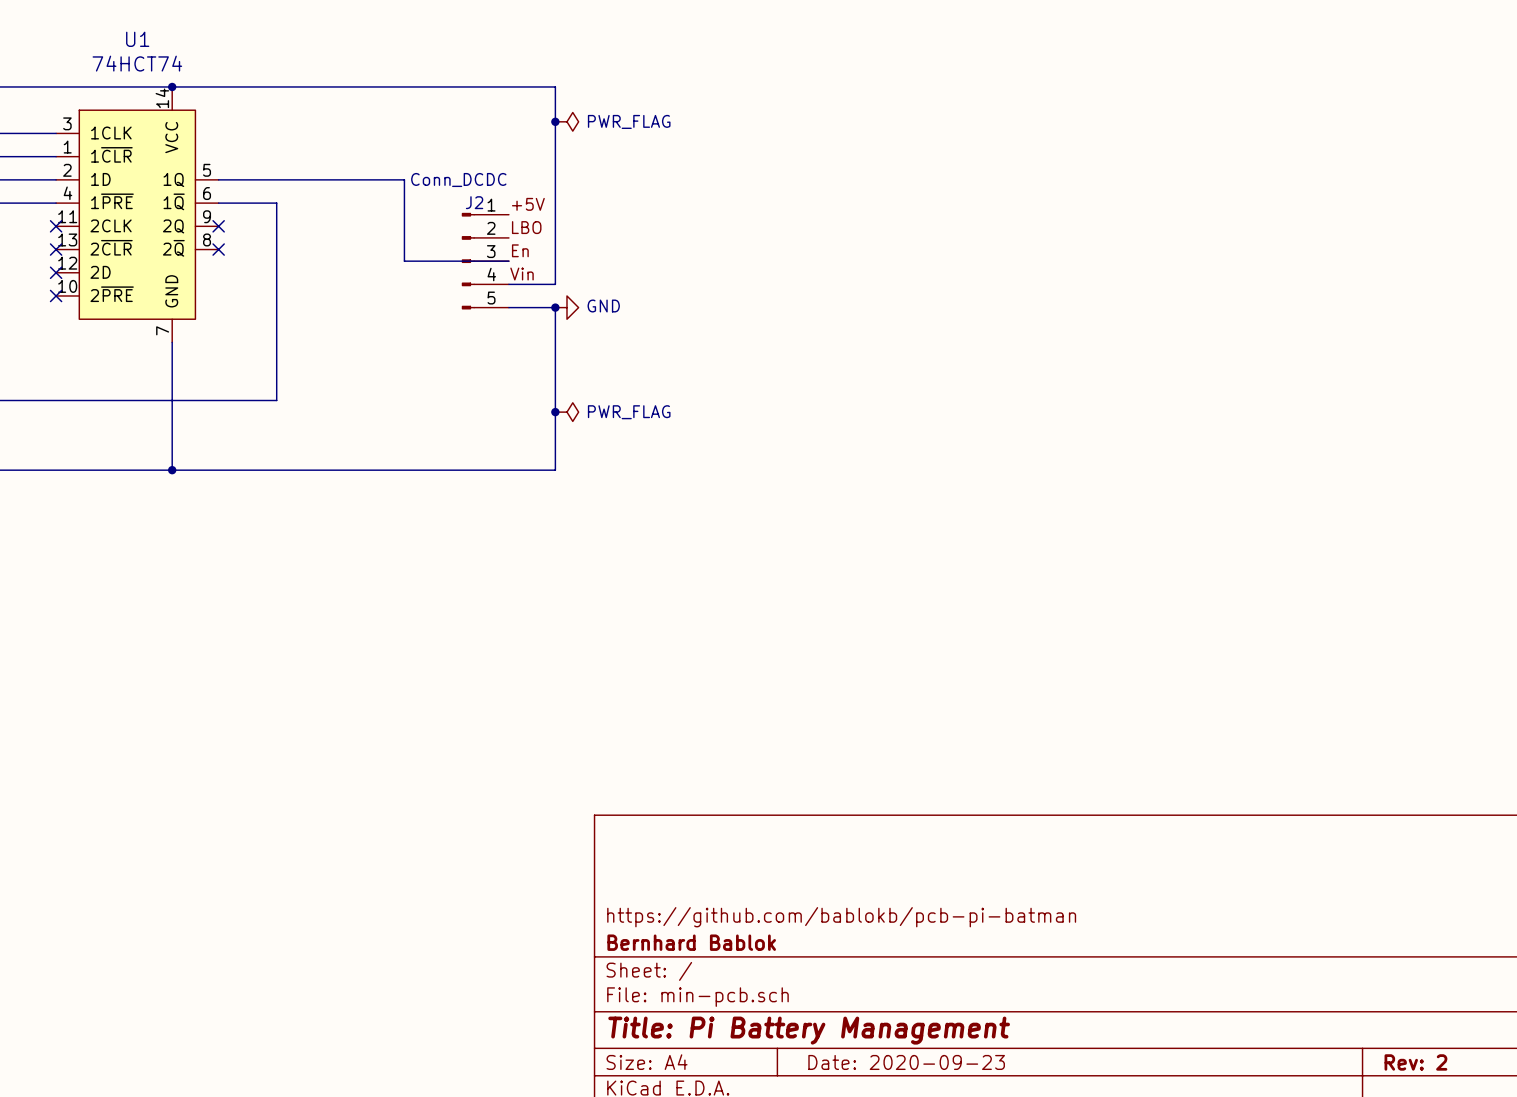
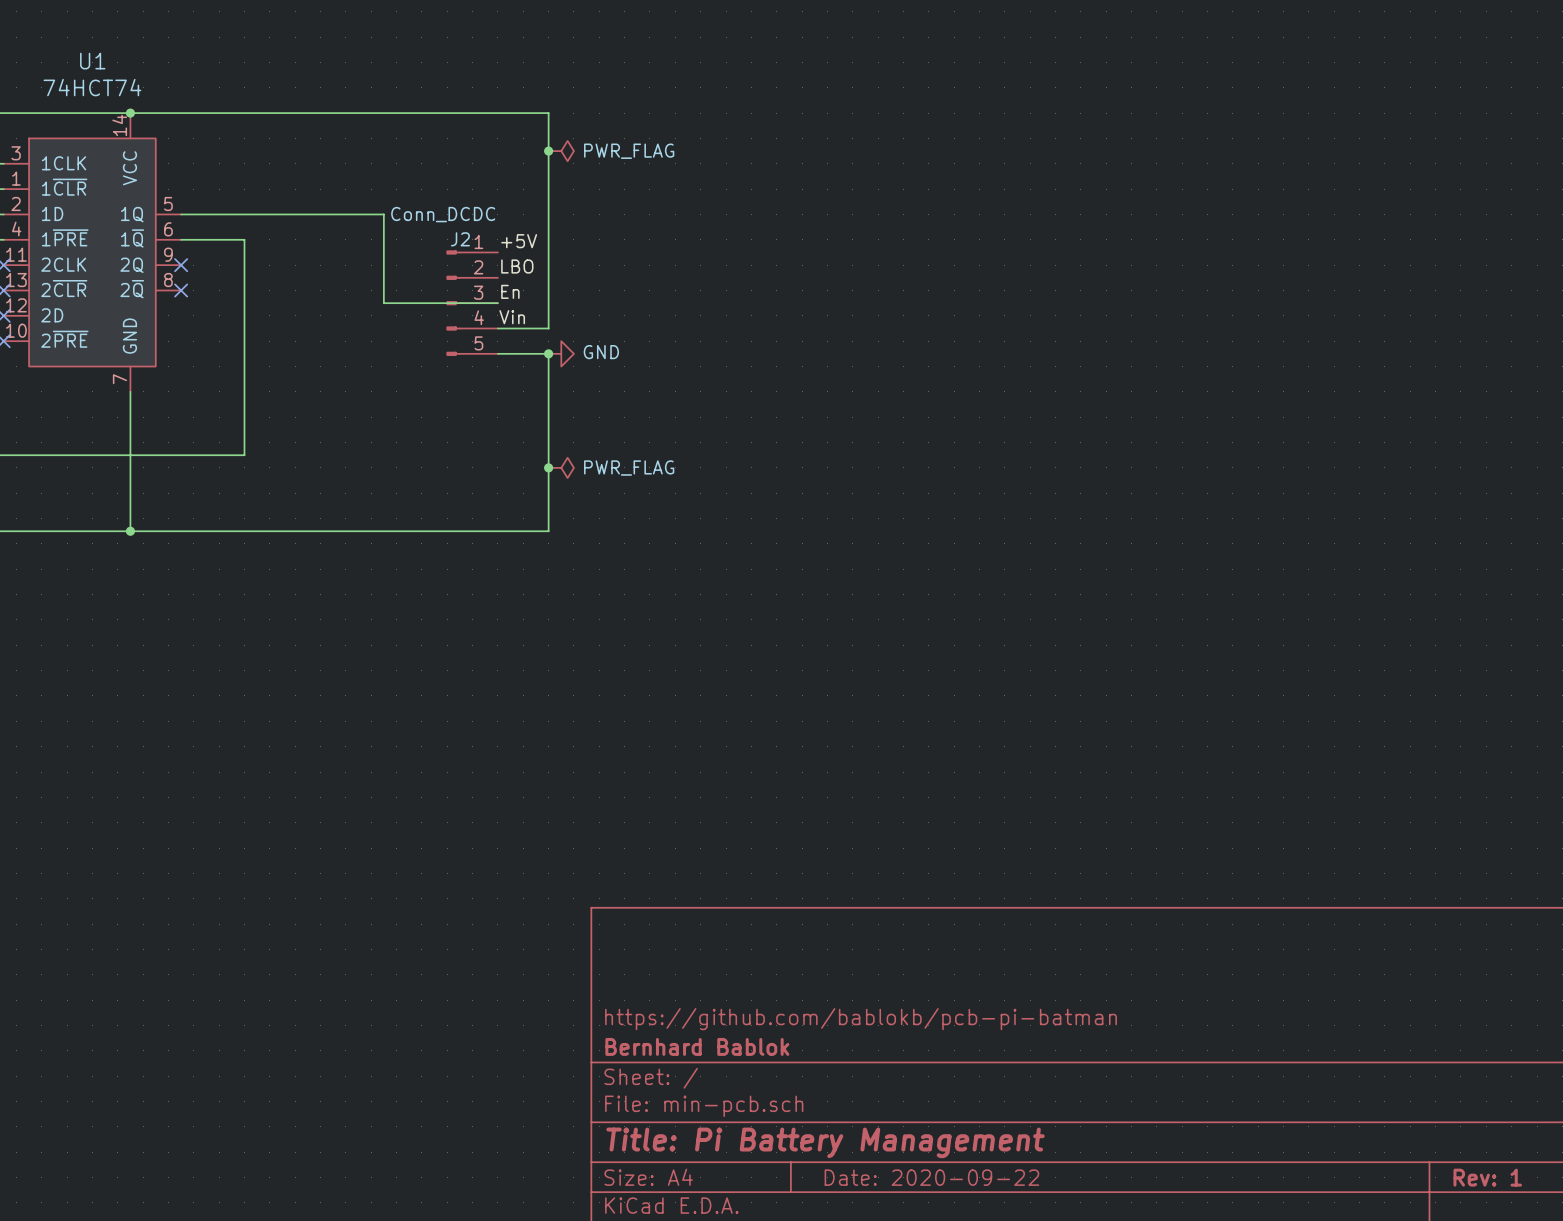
title block: Date: 2020-09-23 (906, 1062) -> Date: 2020-09-22 (931, 1177)
title block: Rev: 2 (1415, 1062) -> Rev: 1 (1487, 1177)

